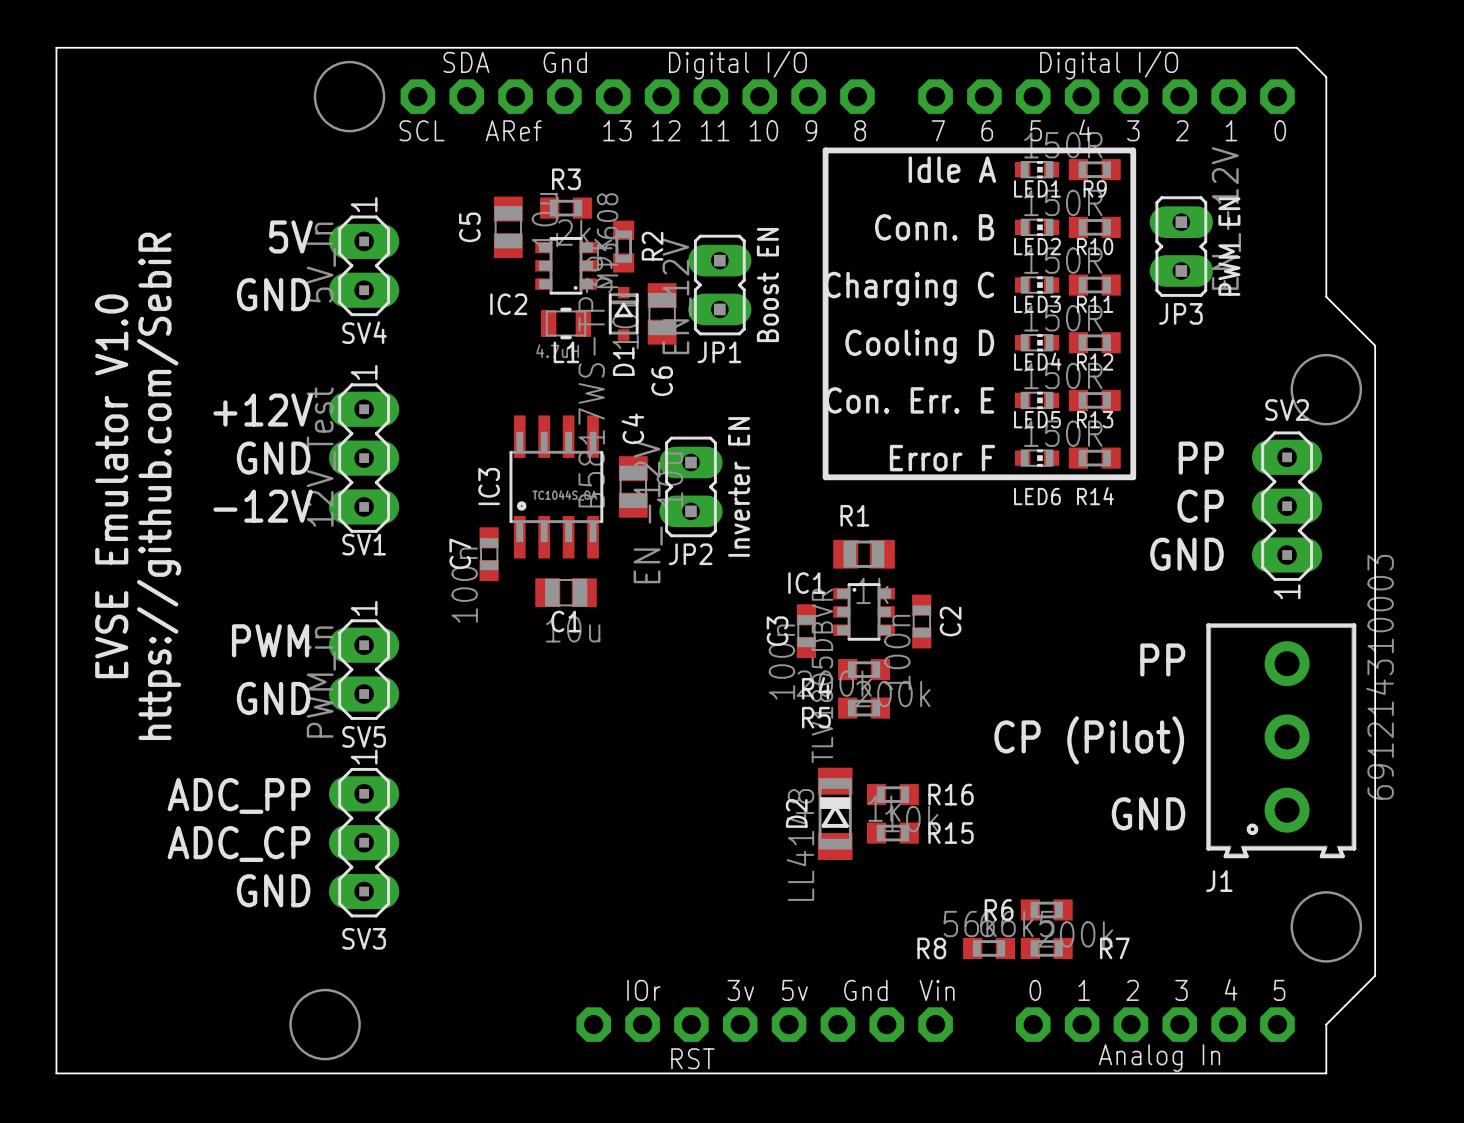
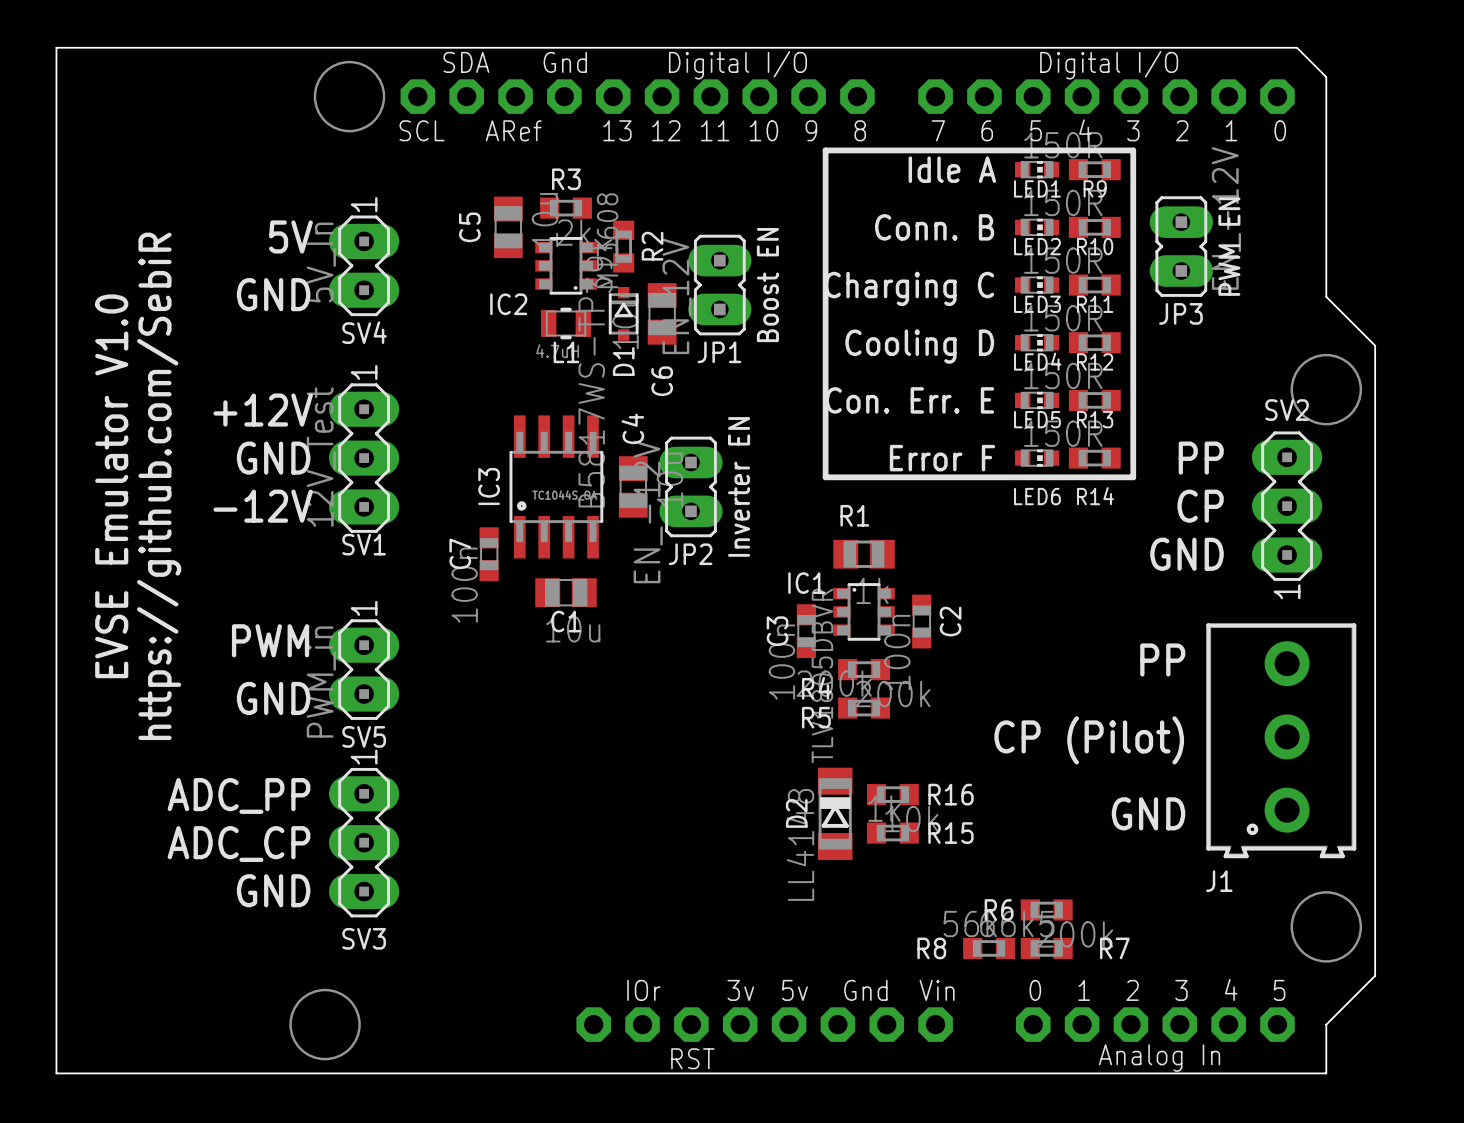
J1 value: 691214310003 (1380, 677) -> none

